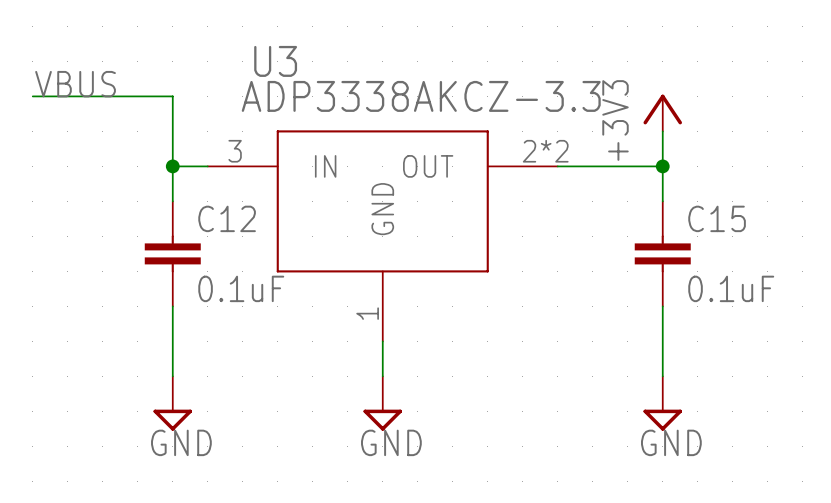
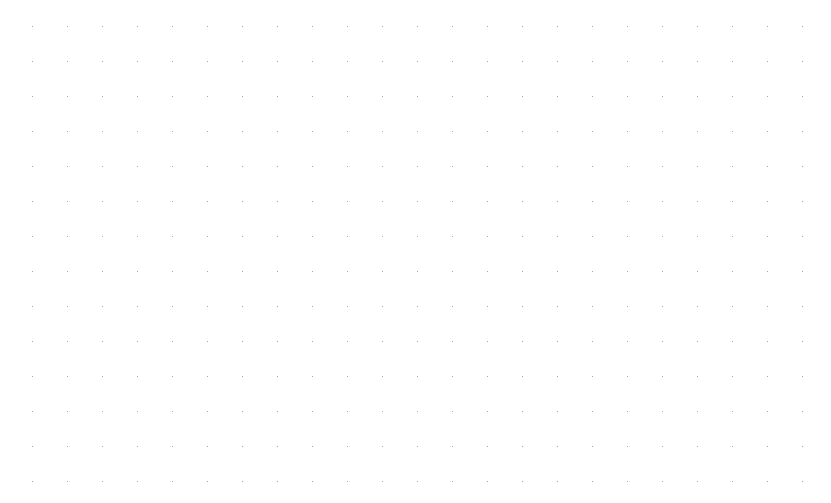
label: VBUS (75, 84) -> none
wire: (32, 96) (172, 96) (172, 201) -> none
power symbol: +3V3 (662, 113) -> none
wire: (662, 131) (662, 201) -> none
wire: (172, 166) (207, 166) -> none
junction: (172, 166) -> none
wire: (557, 166) (662, 166) -> none
junction: (662, 166) -> none
U3: ADP3338AKCZ-3.3 (382, 235) -> none
C12: 0.1uF (172, 253) -> none
C15: 0.1uF (662, 253) -> none
wire: (172, 306) (172, 376) -> none
wire: (662, 306) (662, 376) -> none
wire: (382, 341) (382, 376) -> none
power symbol: GND (172, 403) -> none
power symbol: GND (382, 403) -> none
power symbol: GND (662, 403) -> none

